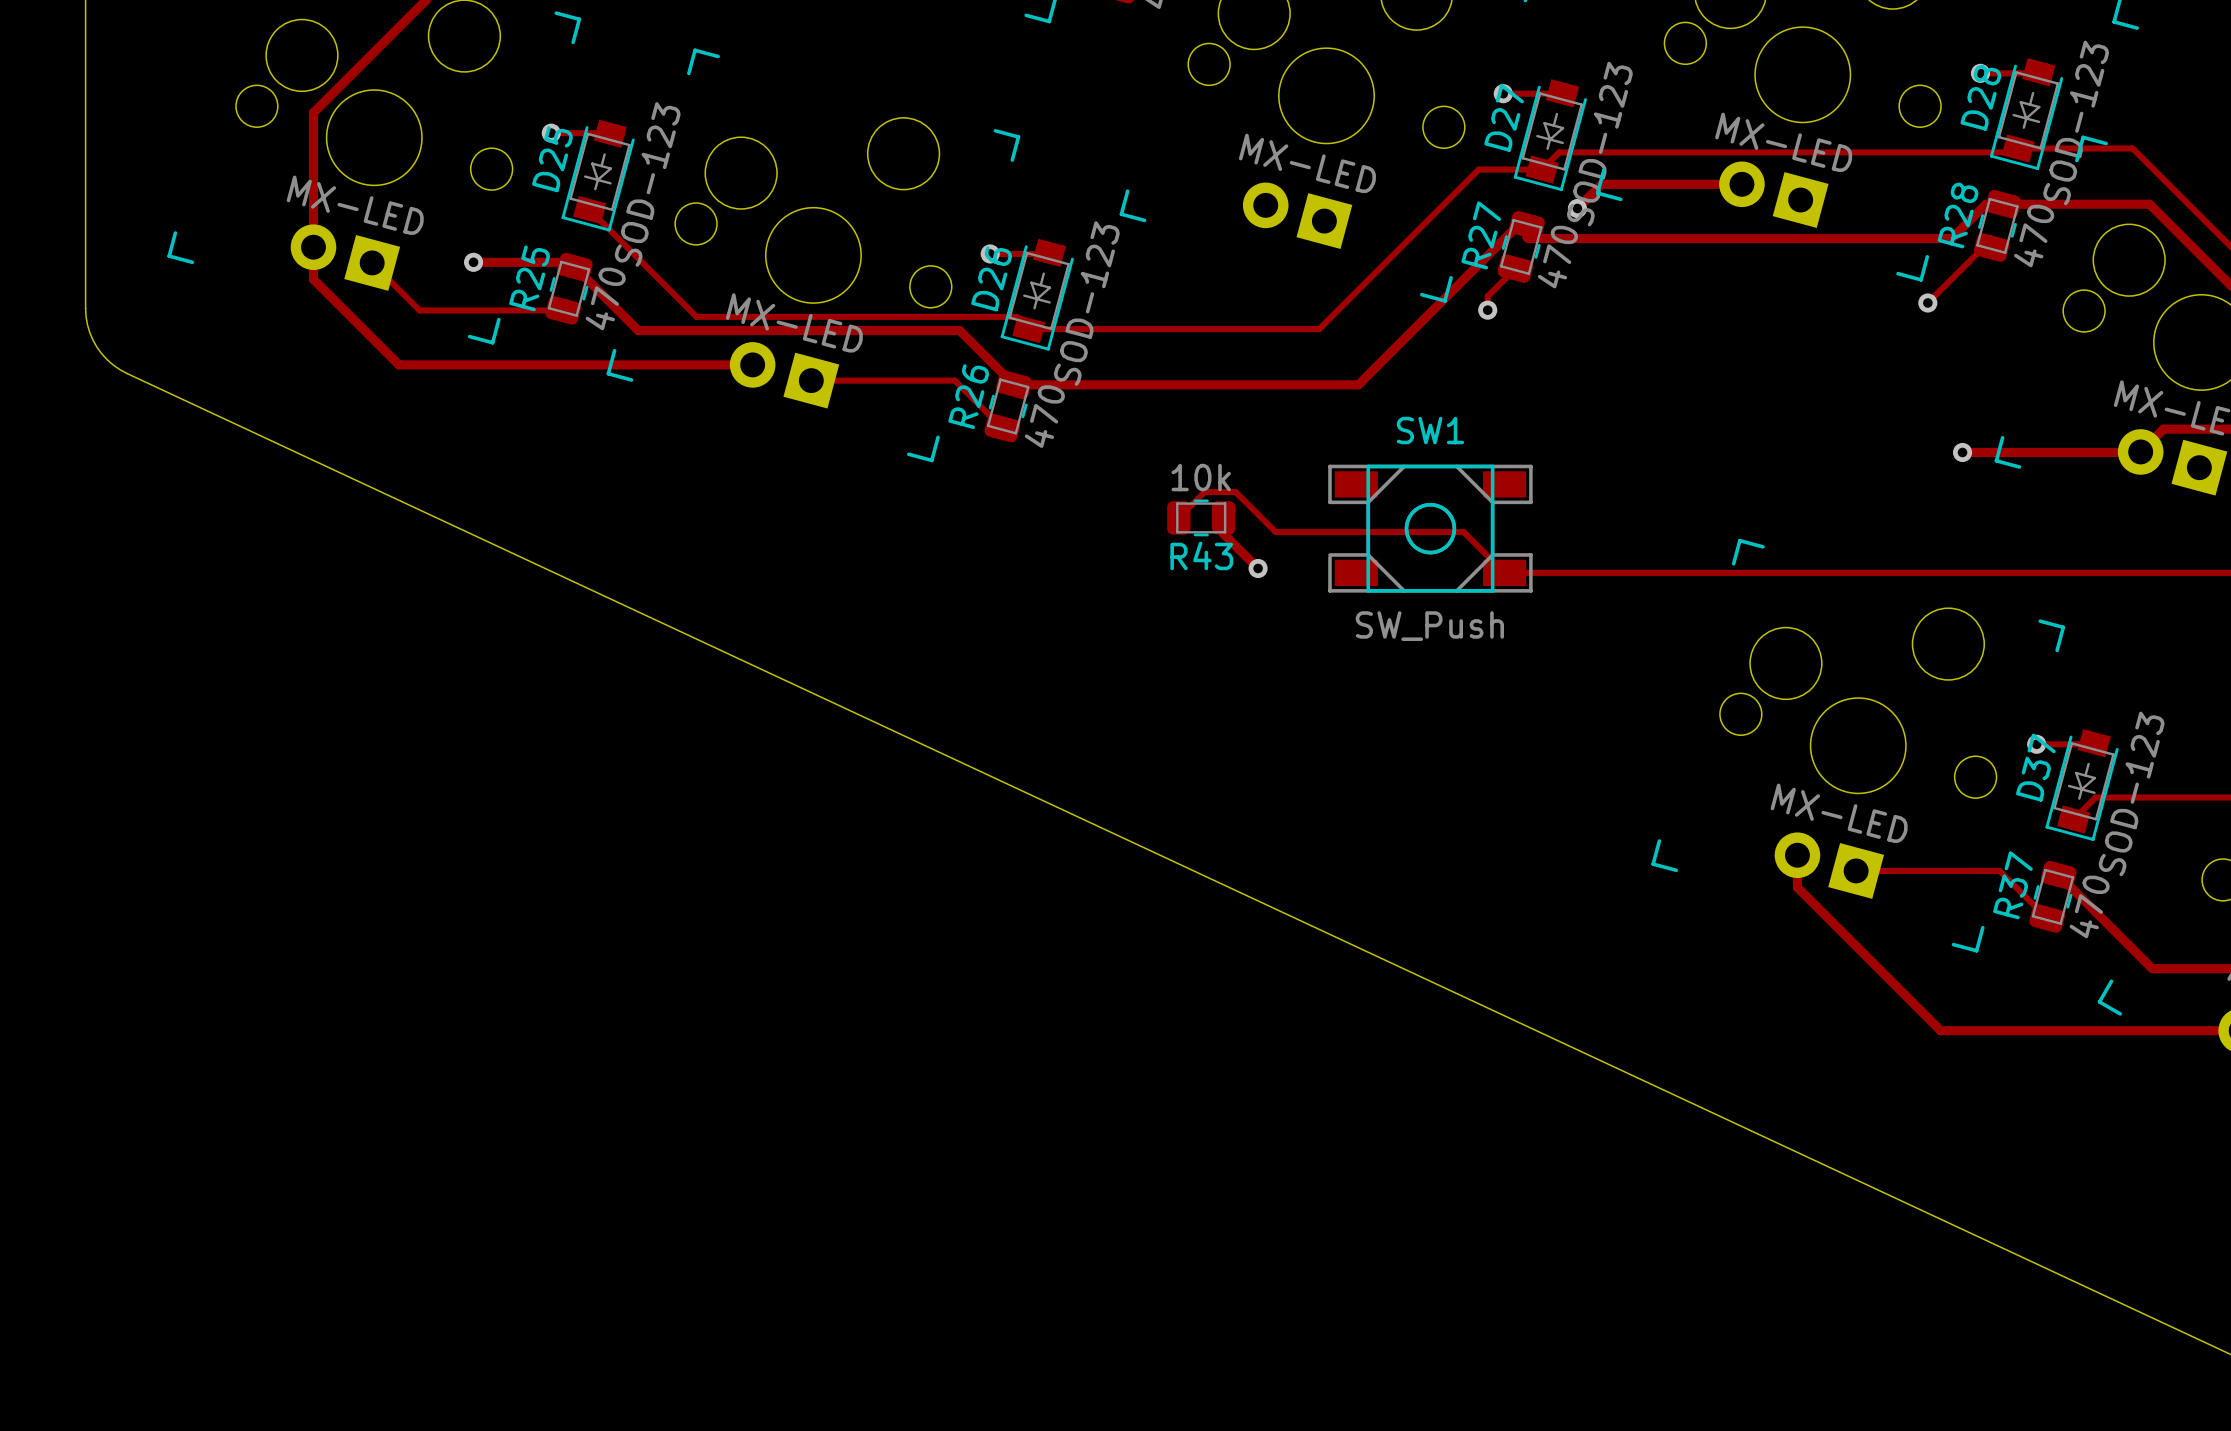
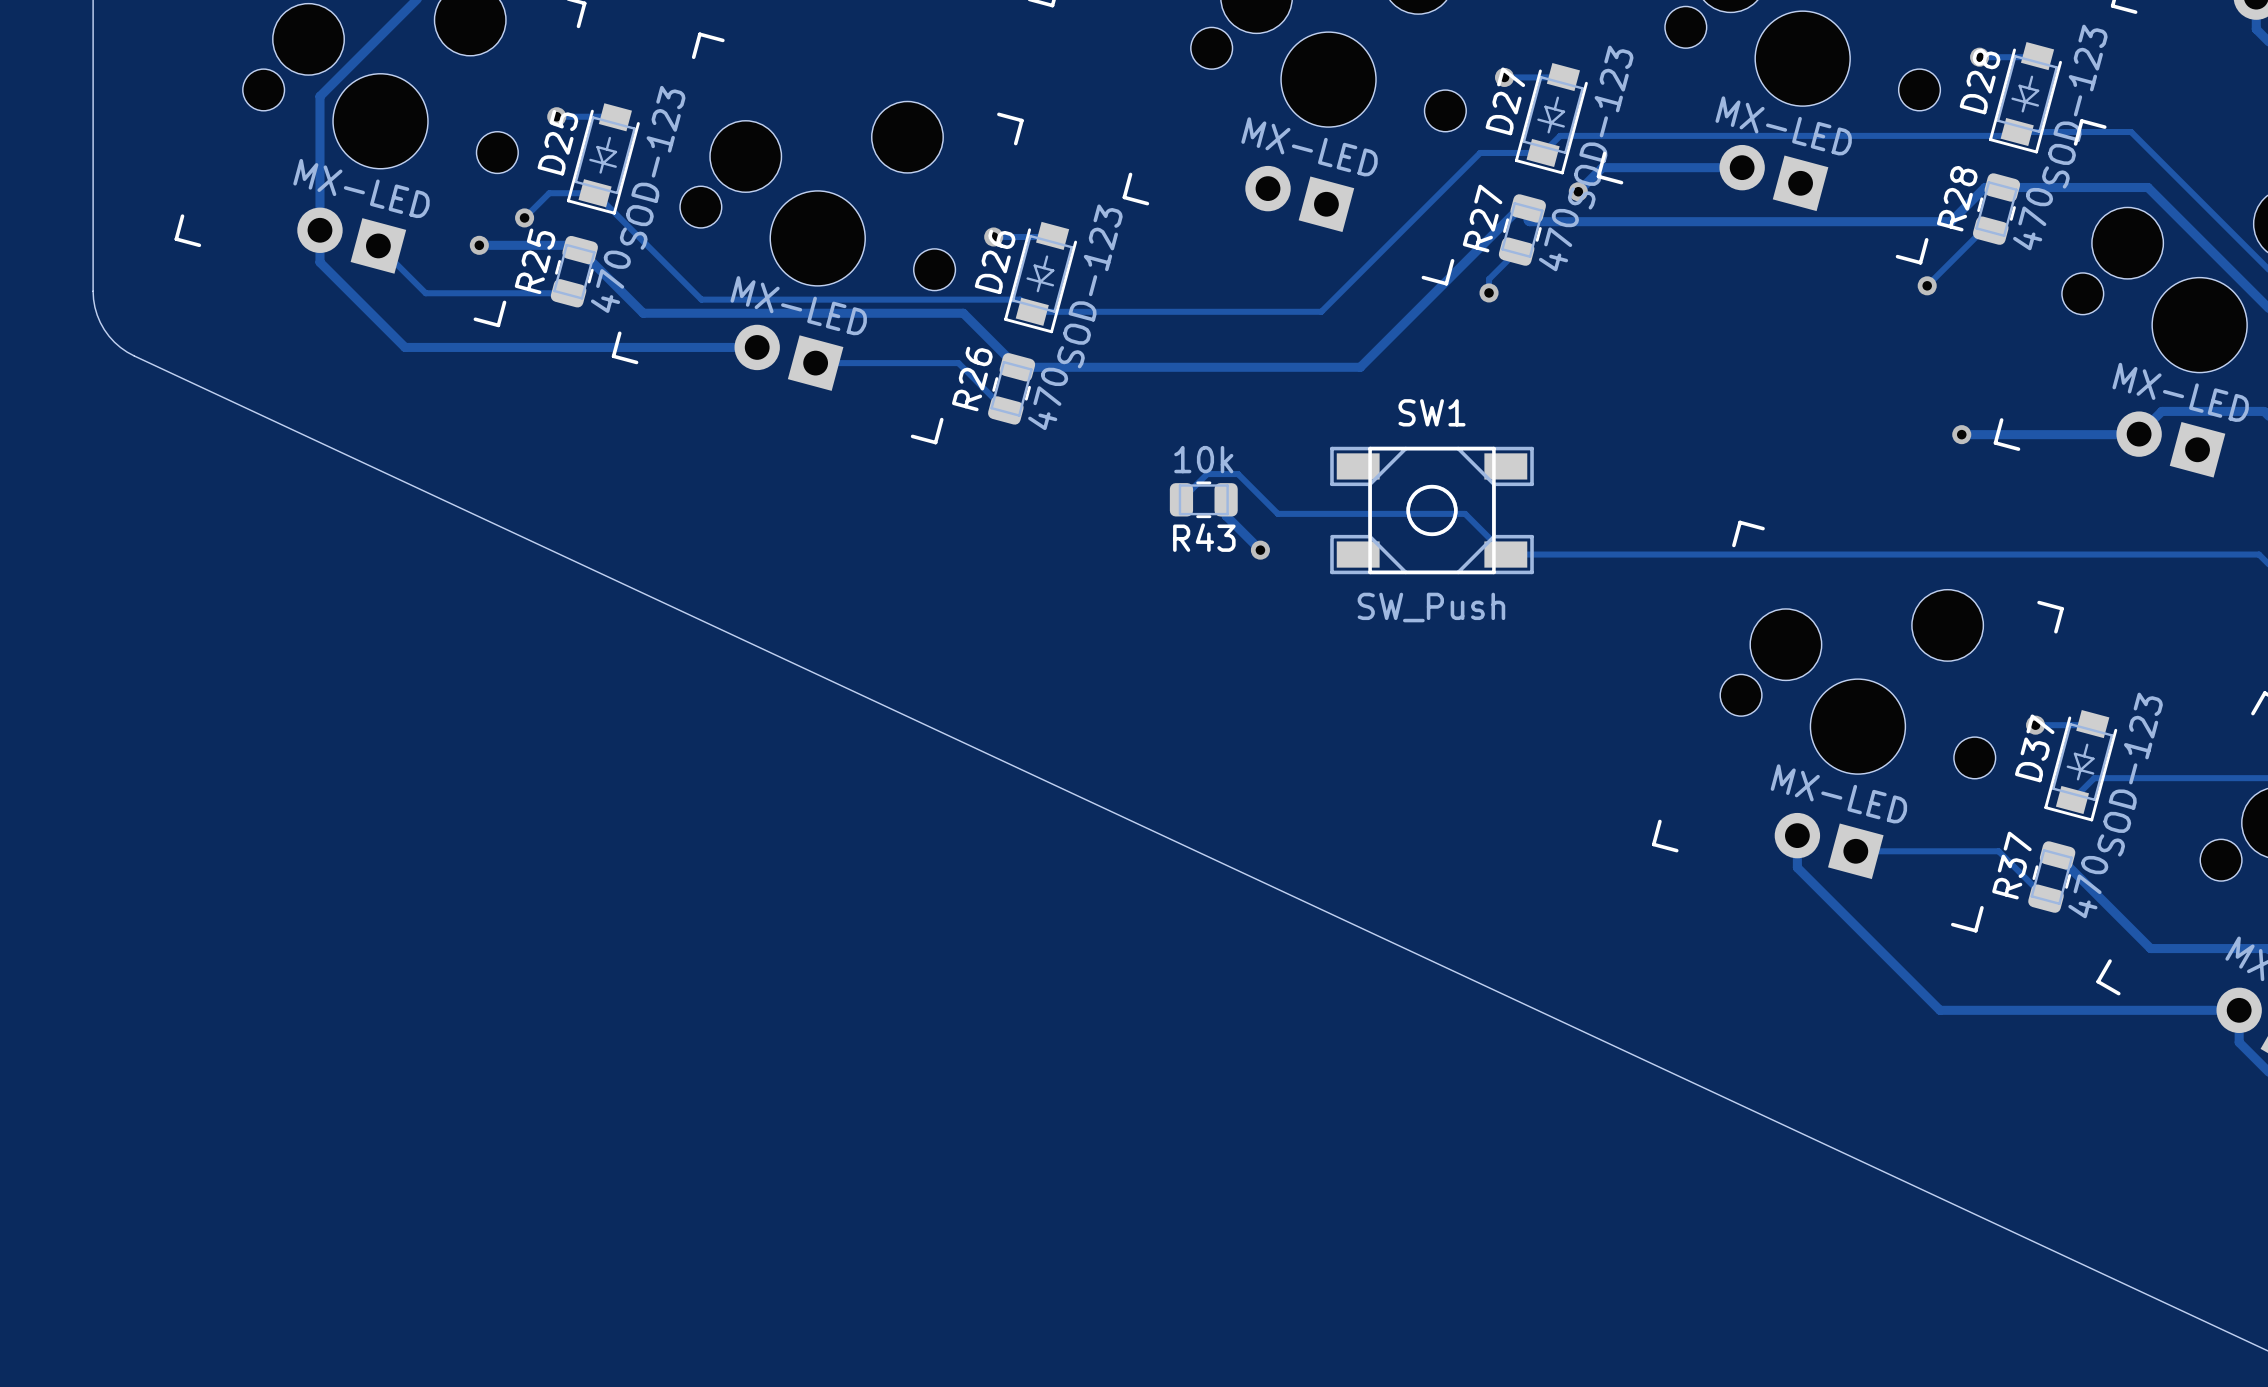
track: none -> (595, 193) (549, 193) (524, 217)
via: none -> (524, 217)

